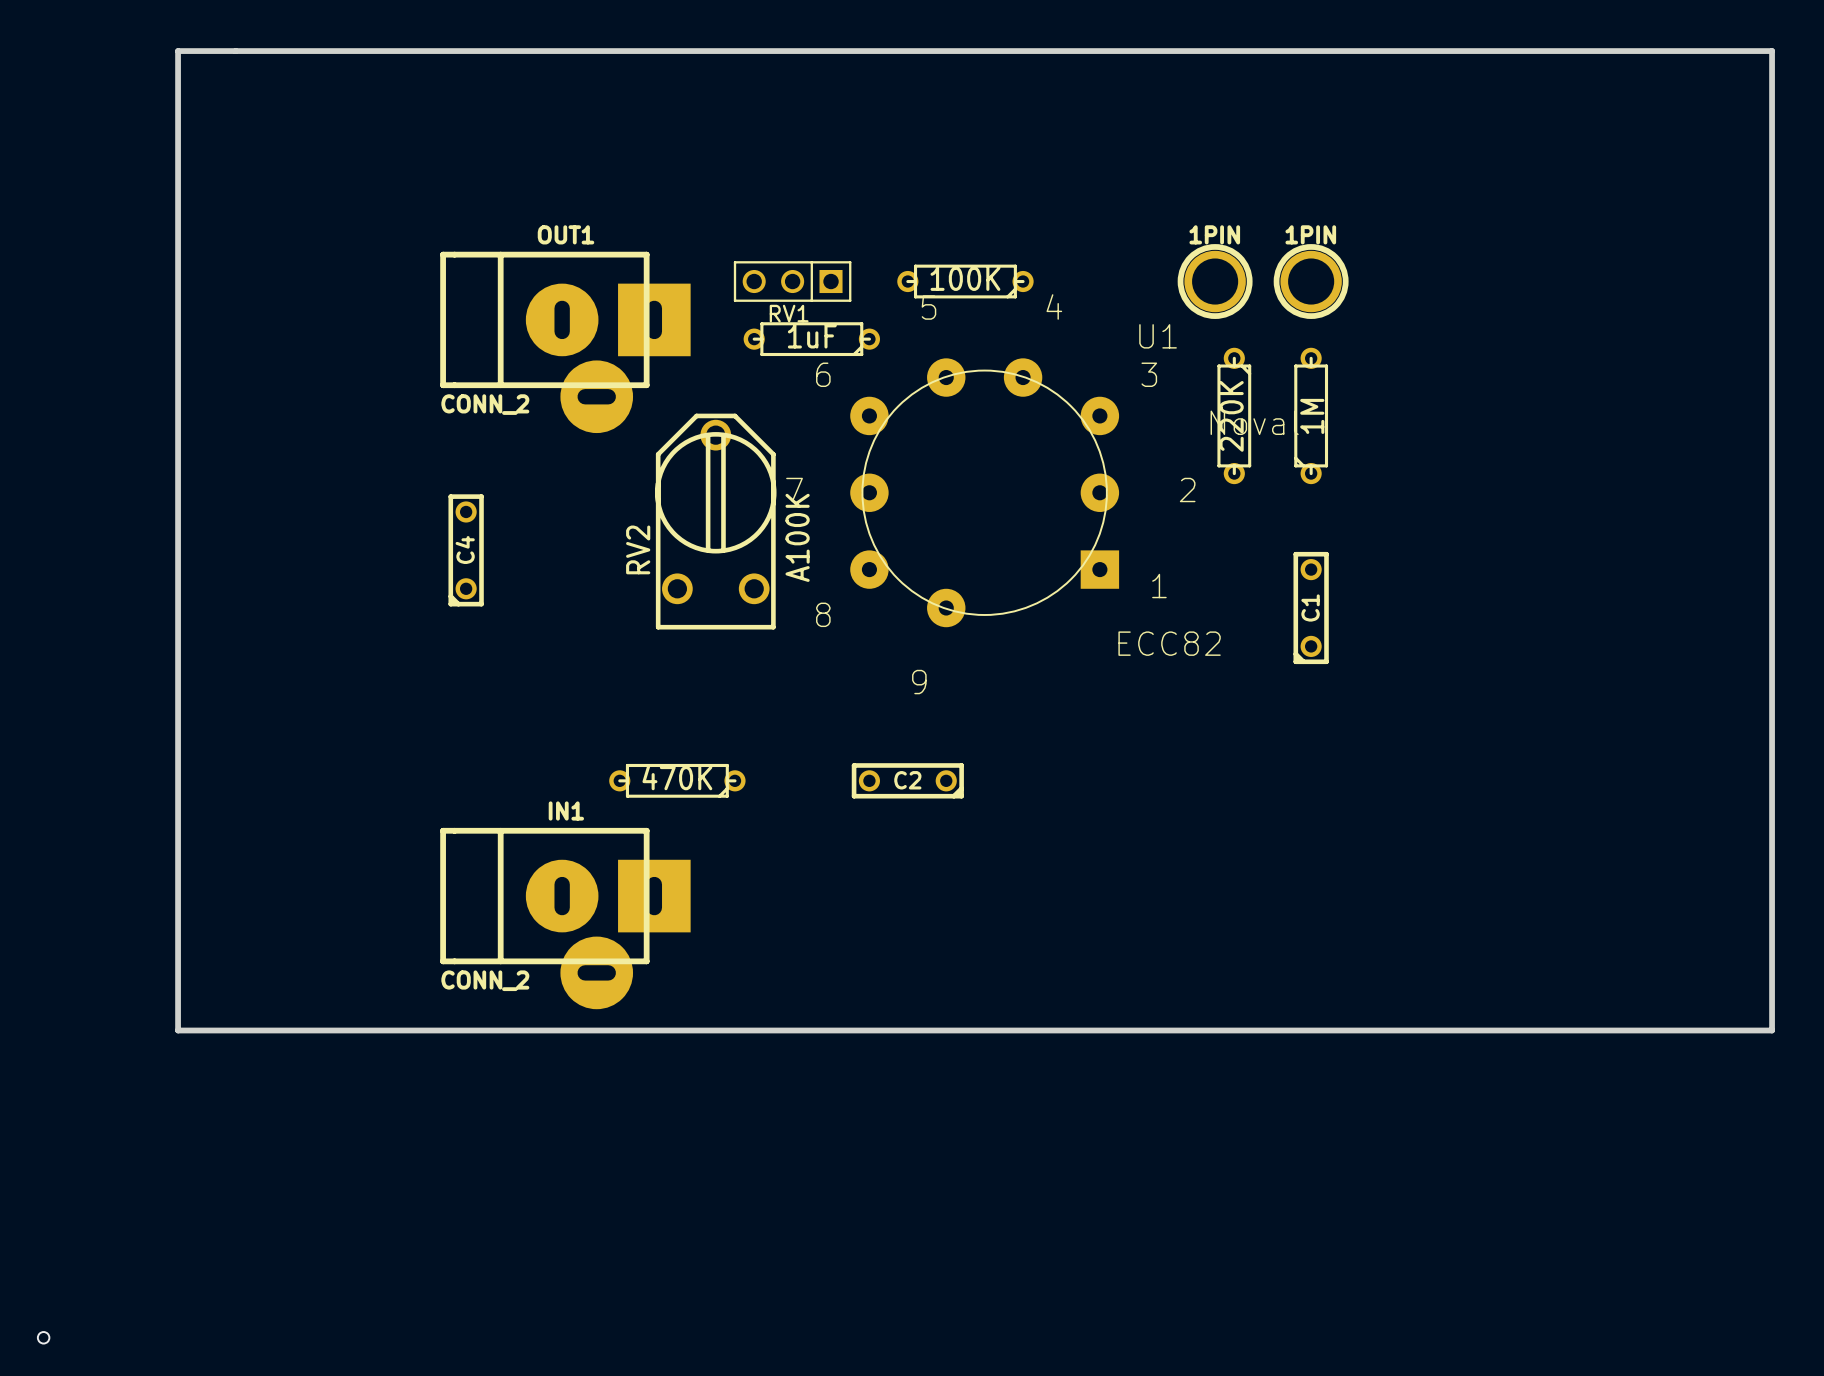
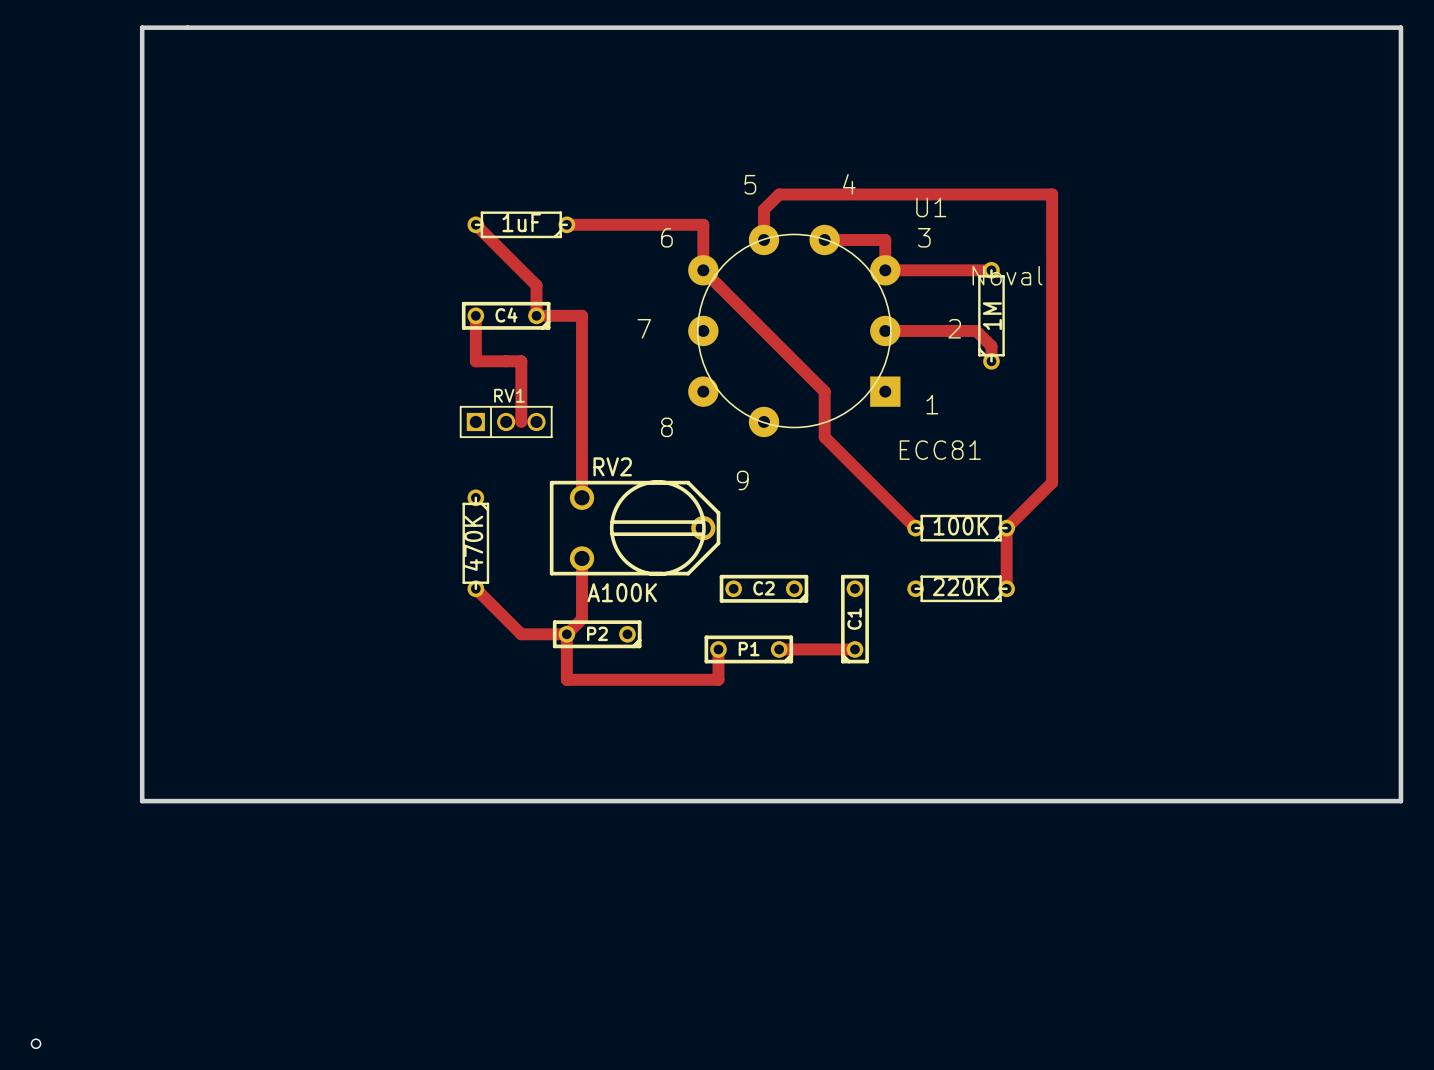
RV1 rotation: 0° (792, 281) -> 180° (506, 421)
RV1 position: (792, 281) -> (506, 421)
part: 100K (965, 281) -> none
1PIN: (1215, 281) -> none
1PIN: (1311, 281) -> none
track: none -> (475, 224) (536, 285) (536, 315) (582, 315) (582, 497)
track: none -> (566, 224) (703, 224) (703, 270) (824, 391) (824, 437) (915, 528)
track: none -> (763, 239) (763, 209) (779, 194) (1052, 194) (1052, 482) (1006, 528) (1006, 588)
track: none -> (824, 239) (885, 239) (885, 270) (991, 270)
part position: (811, 339) -> (521, 224)
OUT1: CONN_2 (565, 342) -> none
track: none -> (475, 315) (475, 361) (521, 361) (521, 421)
part rotation: 0° (1234, 415) -> 90° clockwise (961, 588)
part position: (1234, 415) -> (961, 588)
part position: (1311, 415) -> (991, 315)
track: none -> (885, 330) (976, 330) (991, 346) (991, 361)
U1 position: (984, 492) -> (794, 330)
RV2 rotation: 0° (715, 521) -> 90° clockwise (635, 528)
RV2 position: (715, 521) -> (635, 528)
C4 rotation: 0° (466, 550) -> 90° counterclockwise (506, 315)
C4 position: (466, 550) -> (506, 315)
C1 position: (1311, 608) -> (854, 619)
U1 value: ECC82 (1169, 643) -> ECC81 (940, 450)
part: none -> 100K (961, 528)
track: none -> (582, 558) (582, 619) (566, 634)
track: none -> (475, 588) (521, 634) (566, 634)
part rotation: 0° (677, 780) -> 90° counterclockwise (475, 543)
part position: (677, 780) -> (475, 543)
C2 position: (907, 780) -> (763, 588)
track: none -> (566, 634) (566, 679) (718, 679) (718, 649)
P2: none -> (597, 634)
P1: none -> (748, 649)
track: none -> (779, 649) (854, 649)
IN1: CONN_2 (565, 918) -> none

